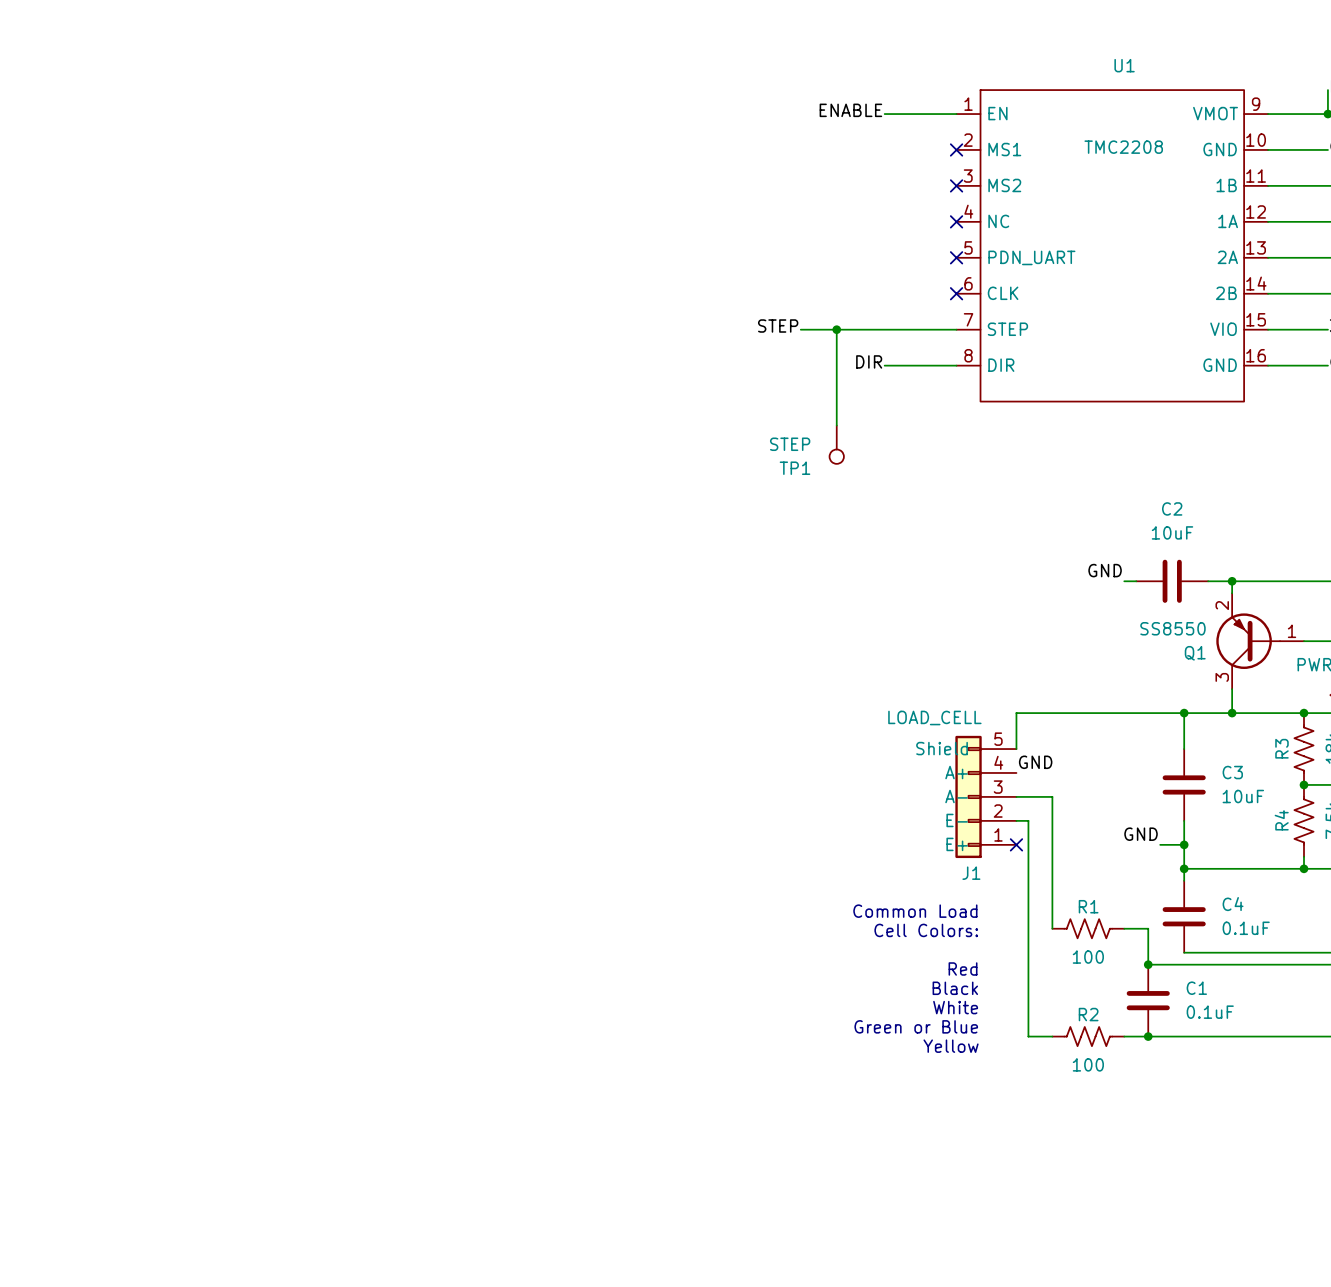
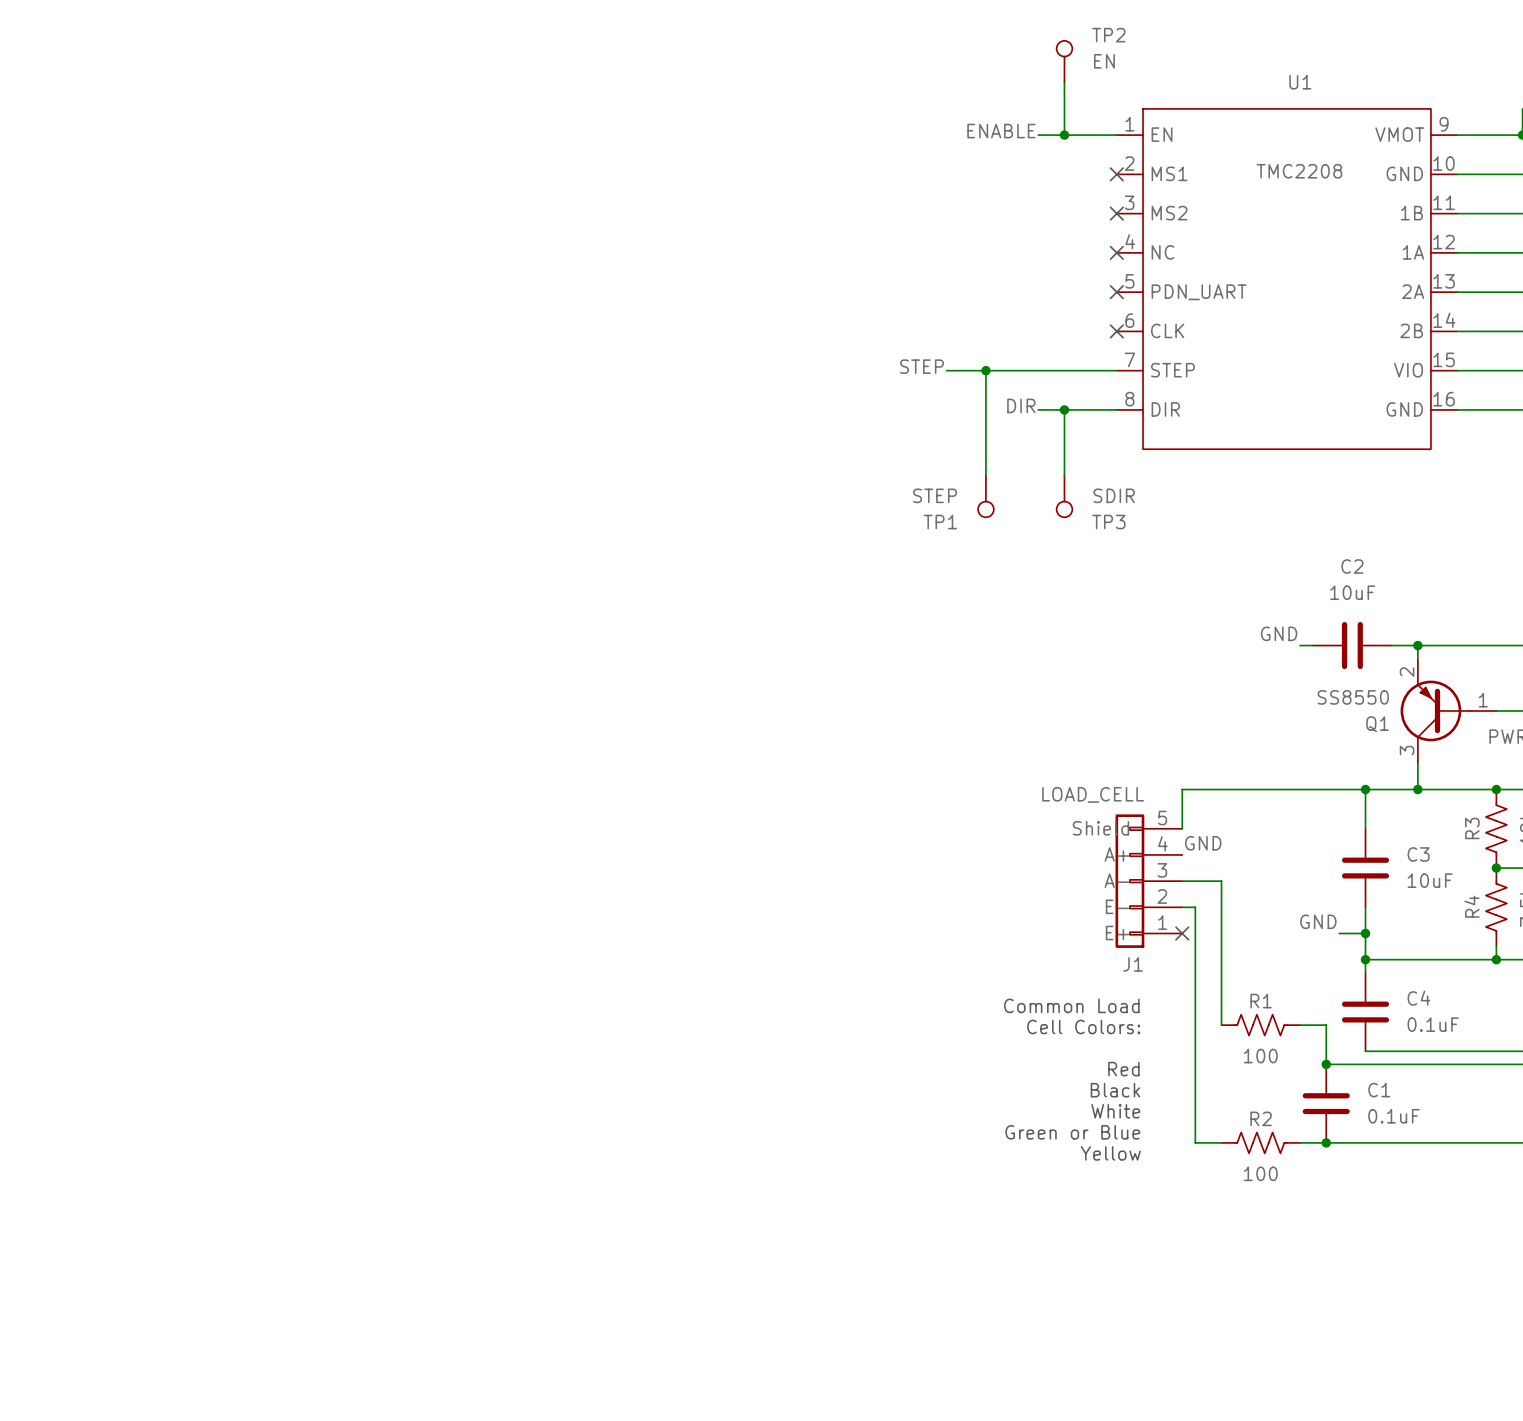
TP2: none -> EN (1064, 61)
wire: none -> (1064, 82) (1064, 135)
junction: none -> (1064, 135)
wire: none -> (1064, 409) (1064, 475)
junction: none -> (1064, 409)
TP3: none -> SDIR (1064, 496)

